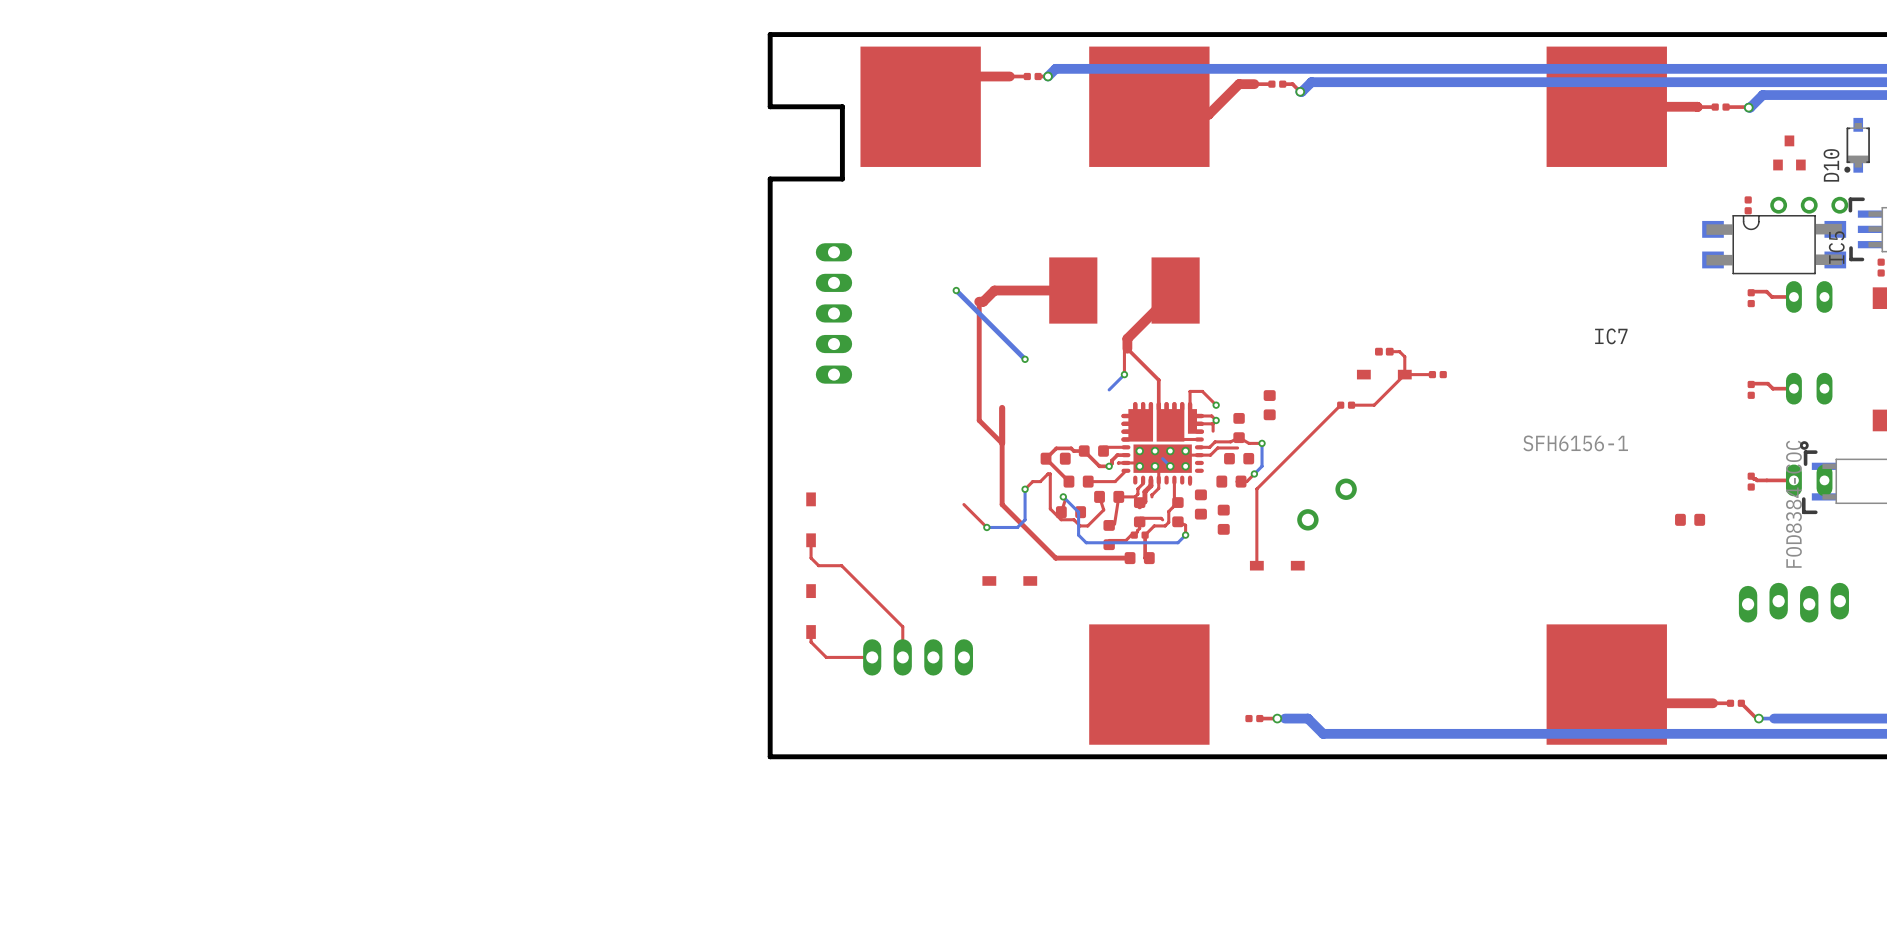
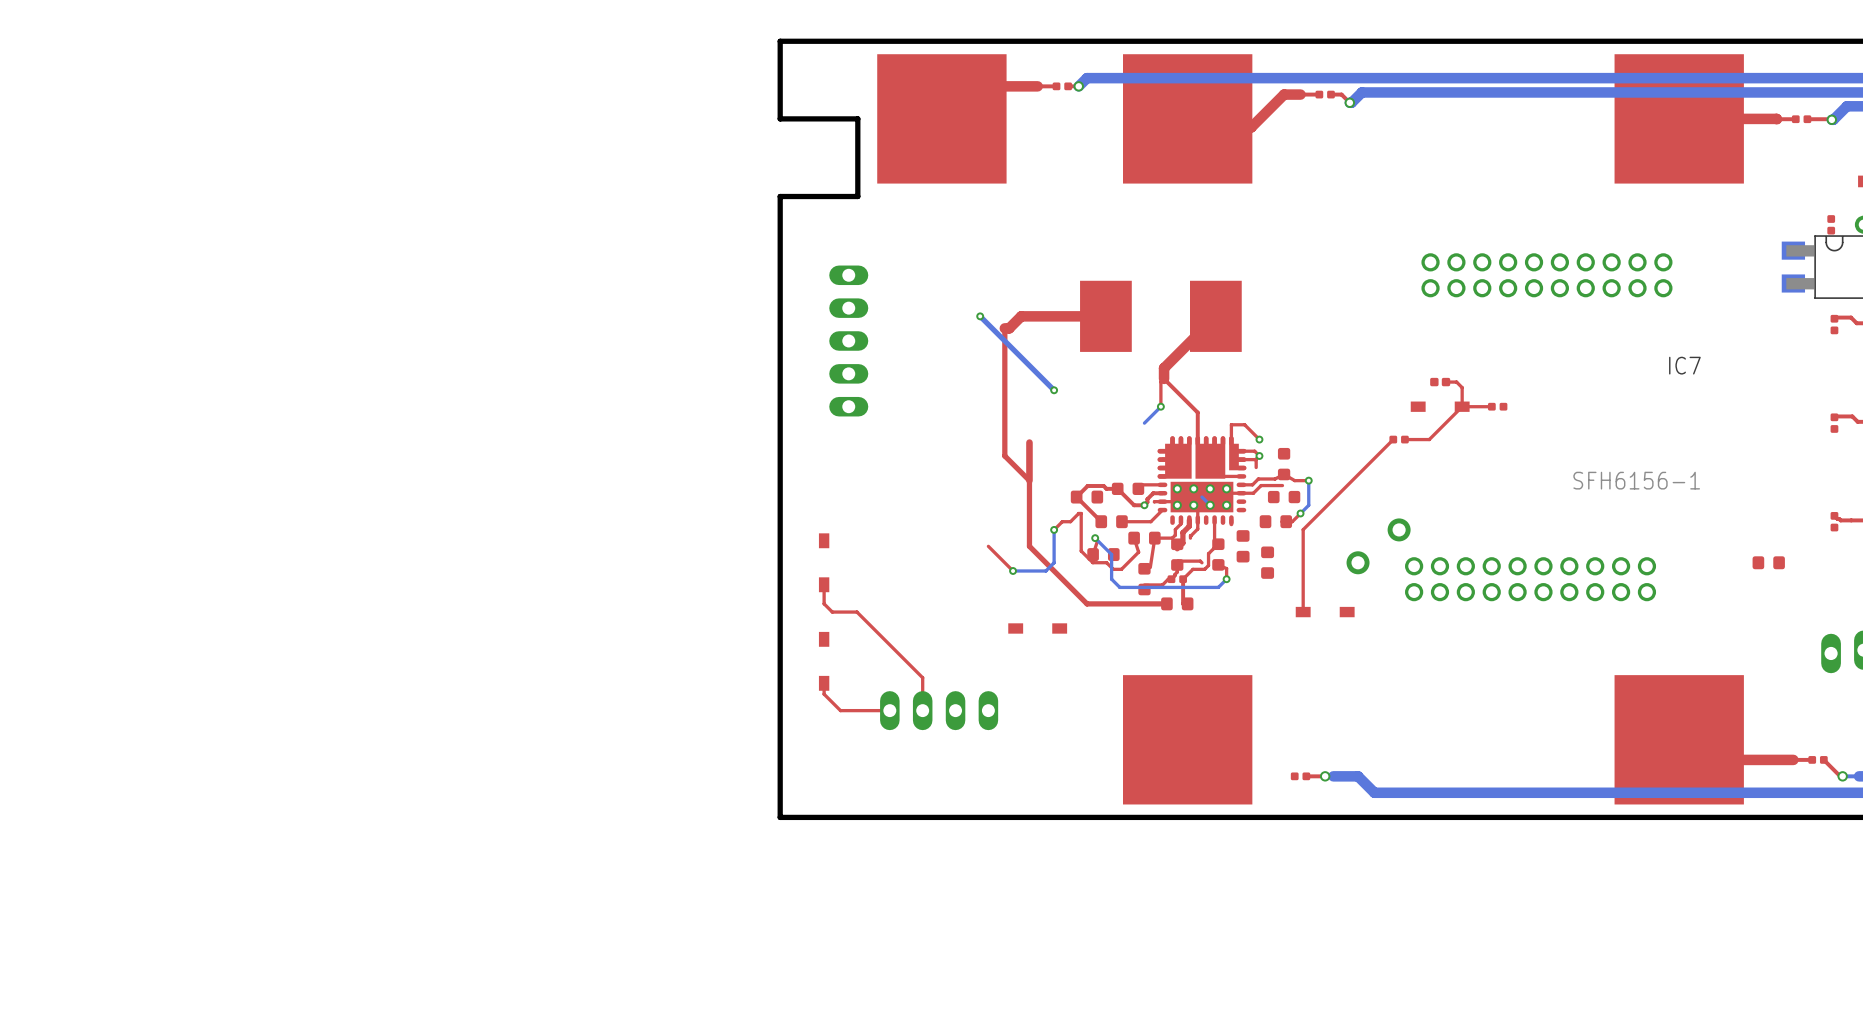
part: none -> (1546, 275)
part: (1269, 405) -> none
part: none -> (1530, 579)

